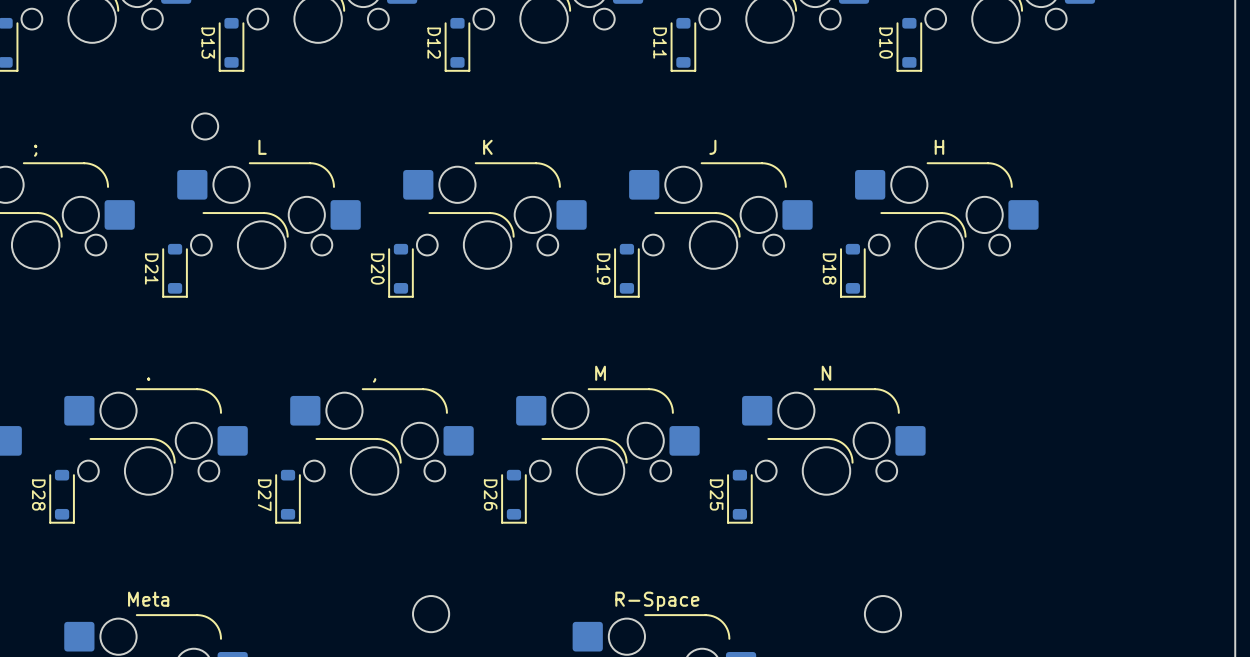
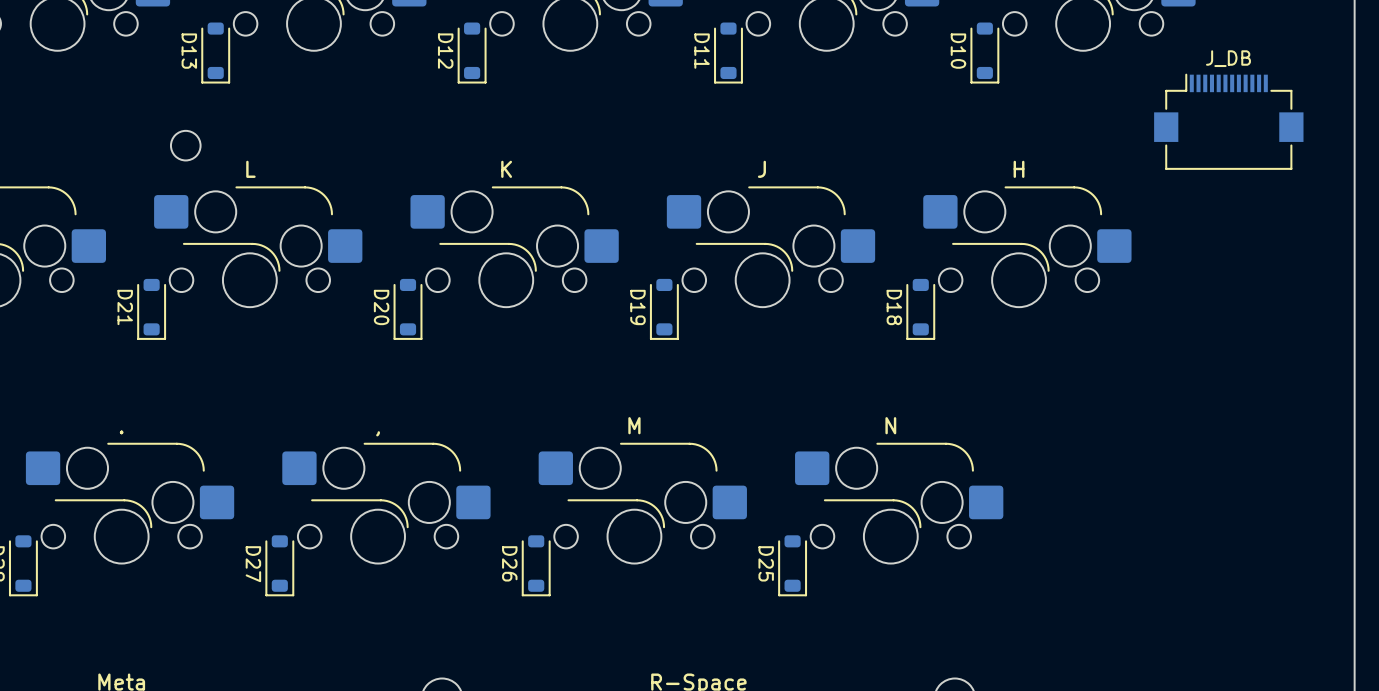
J_DB: none -> (1228, 121)

